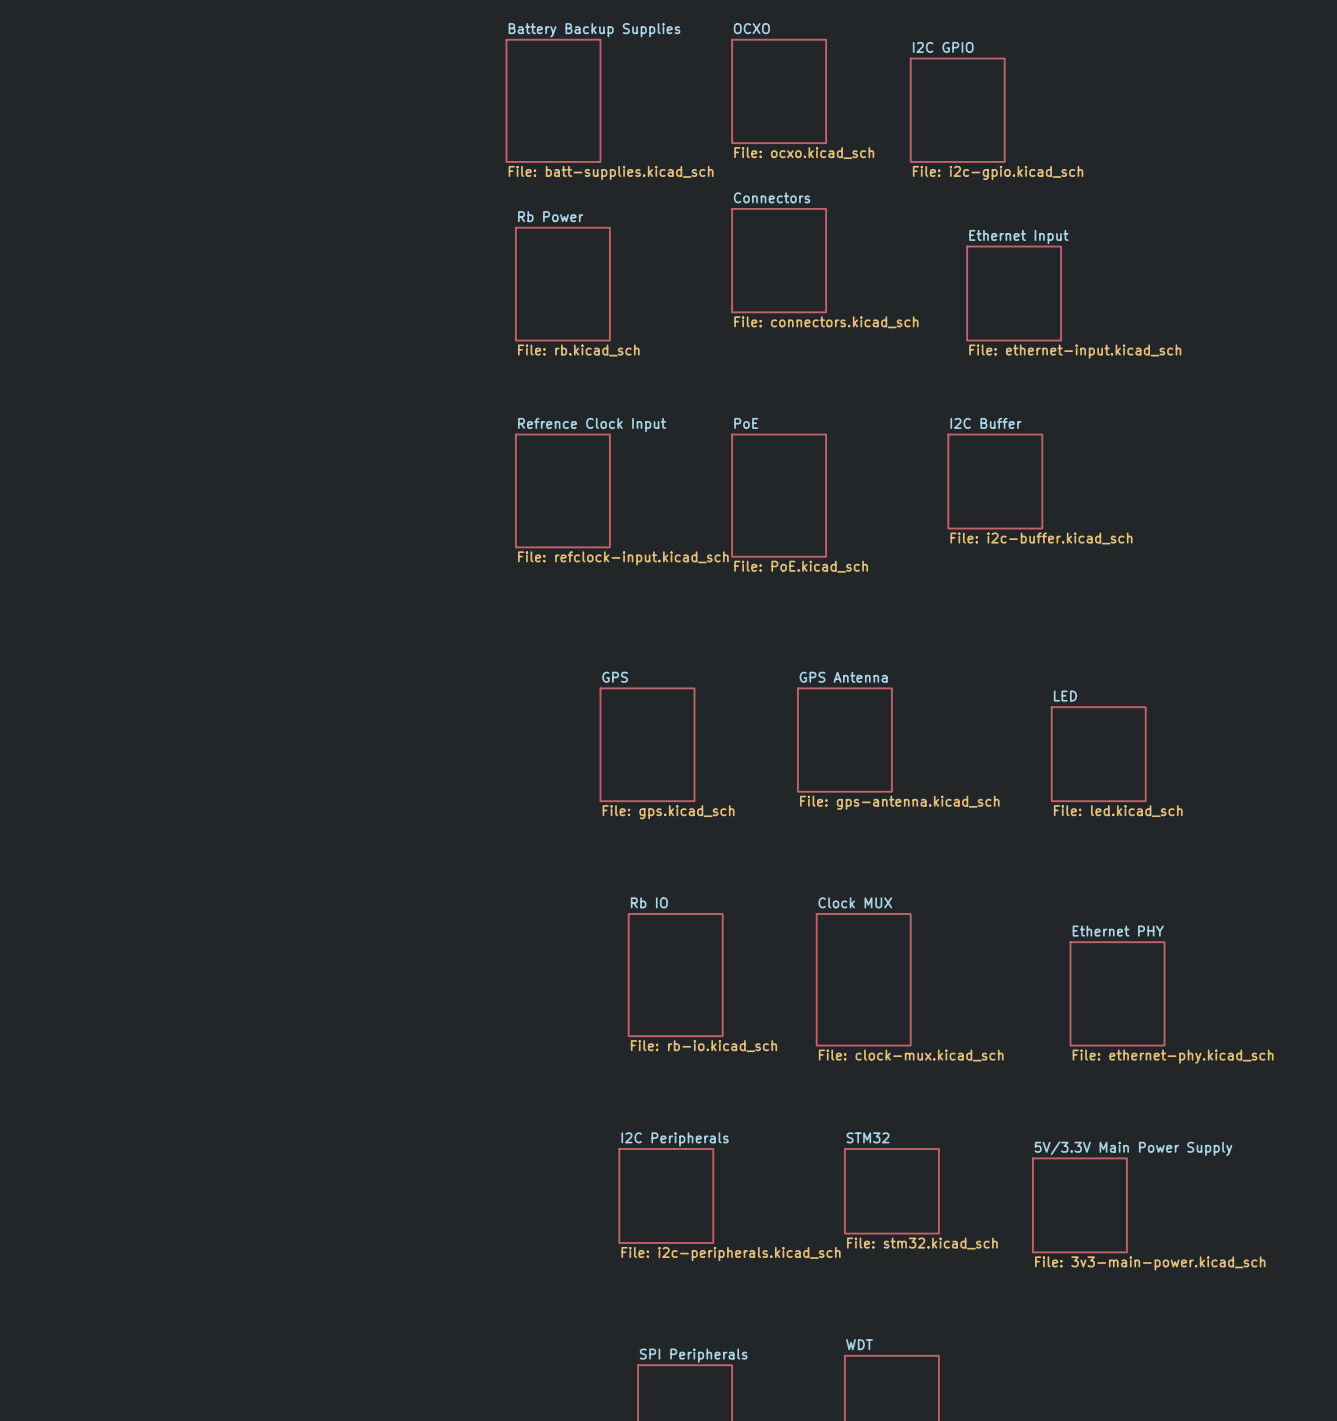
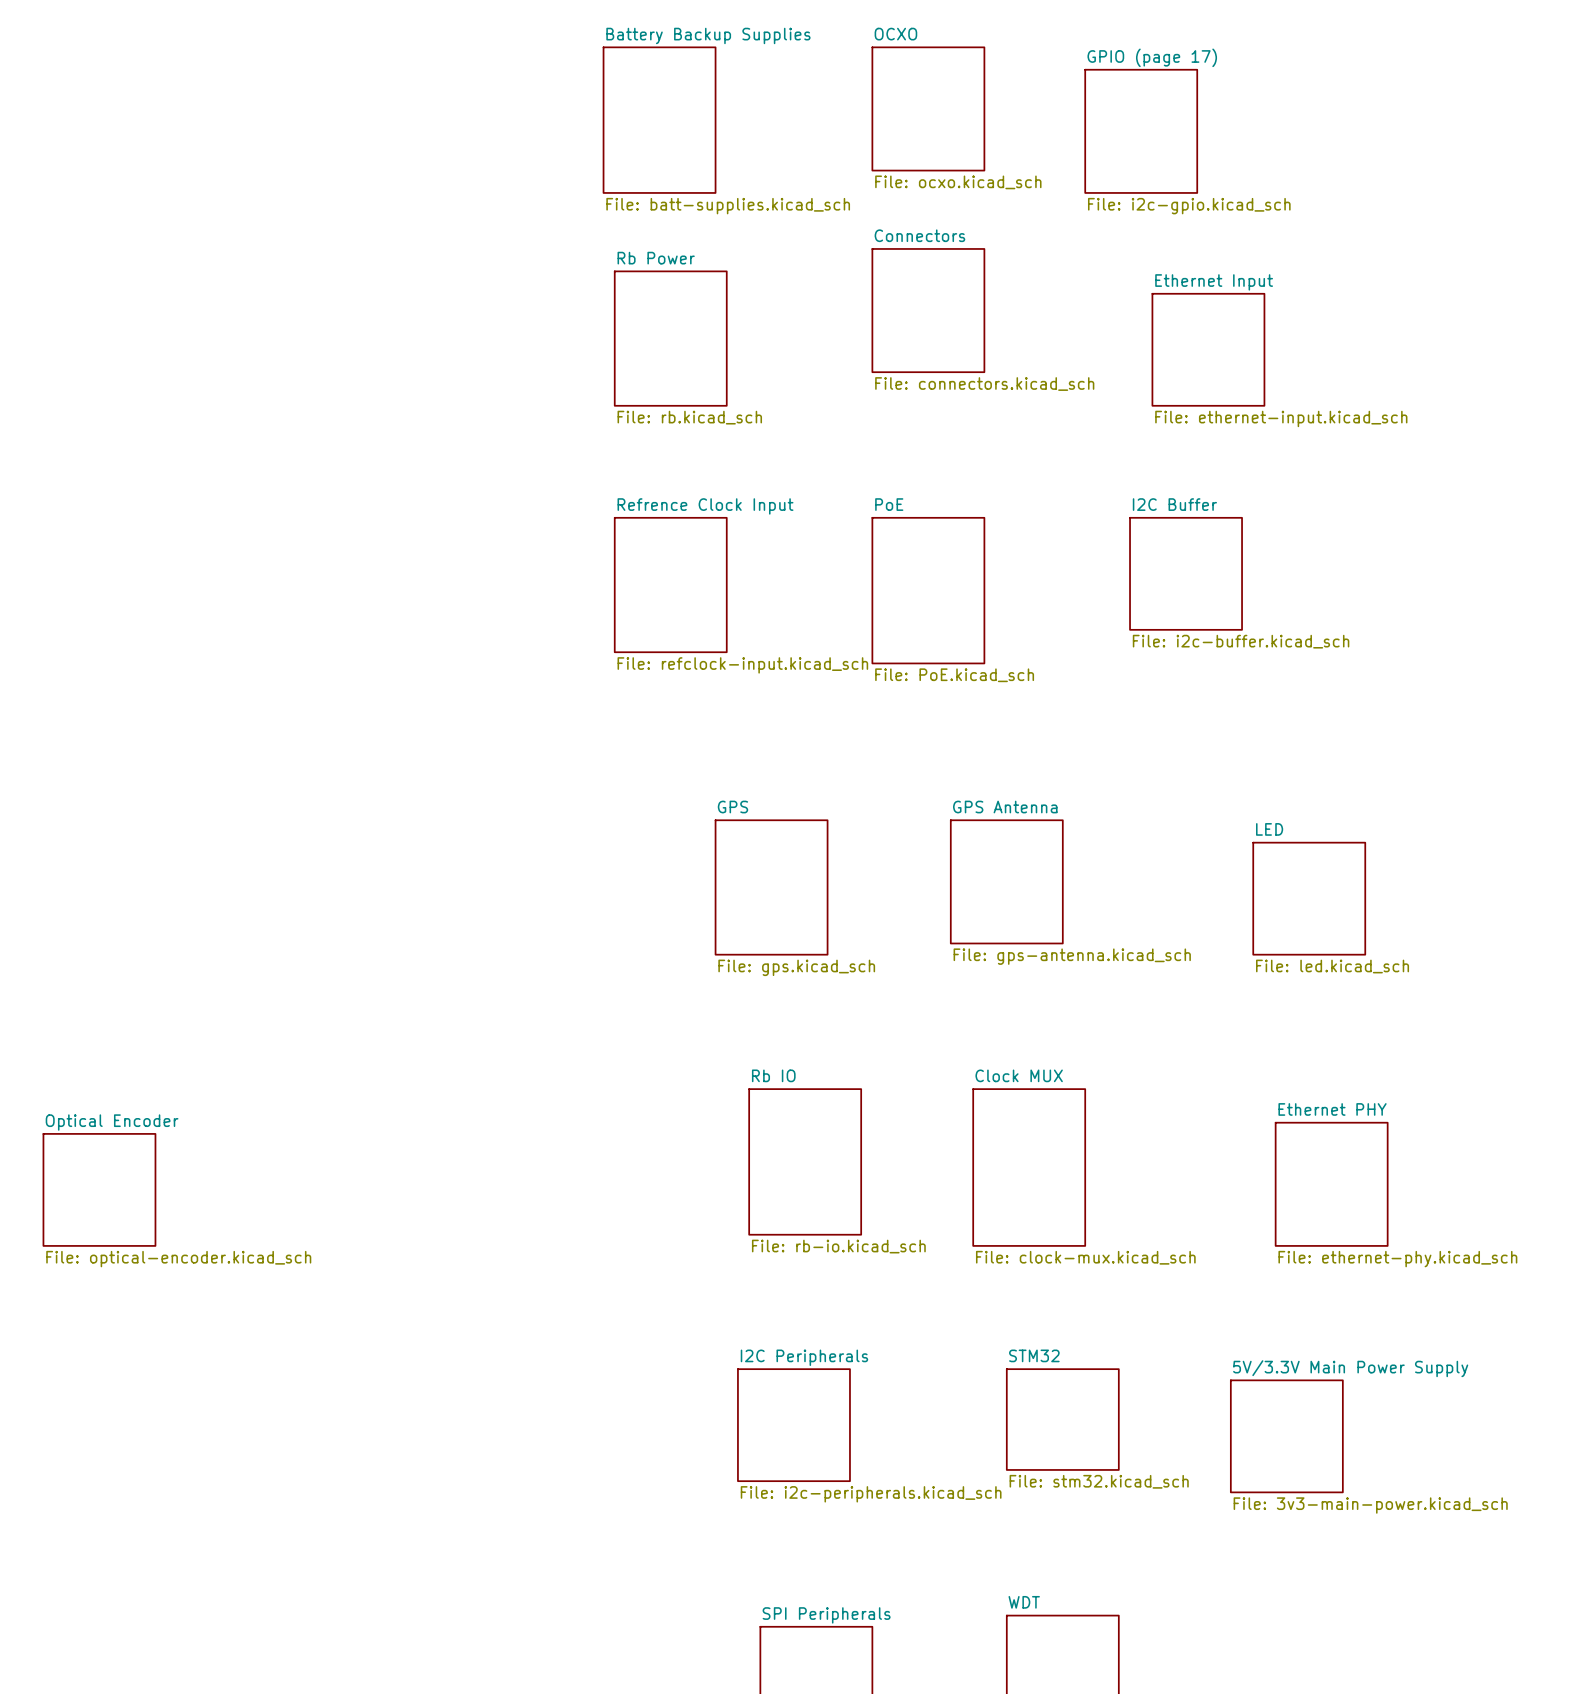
sheet I2C GPIO name: I2C GPIO (943, 47) -> GPIO (page 17) (1152, 57)
sheet Optical Encoder: none -> File: optical-encoder.kicad_sch (99, 1189)

